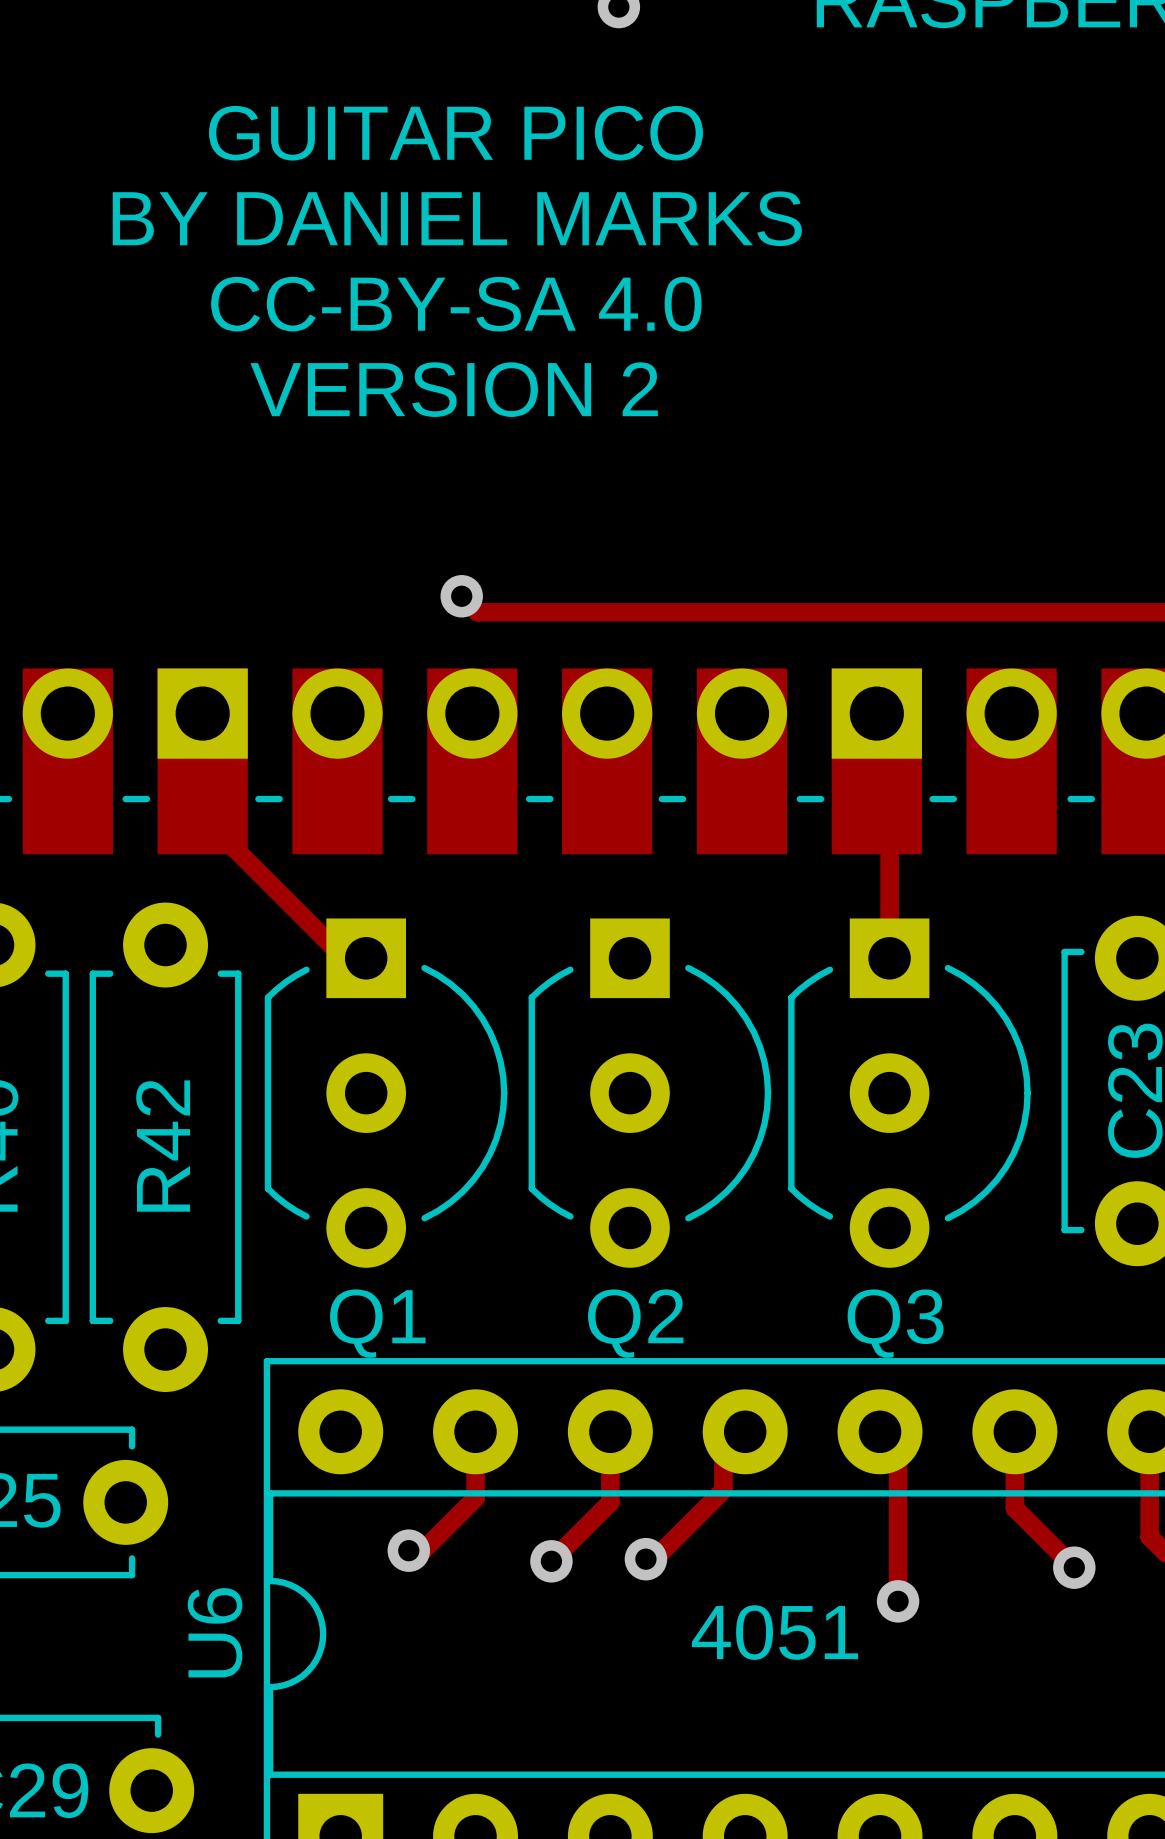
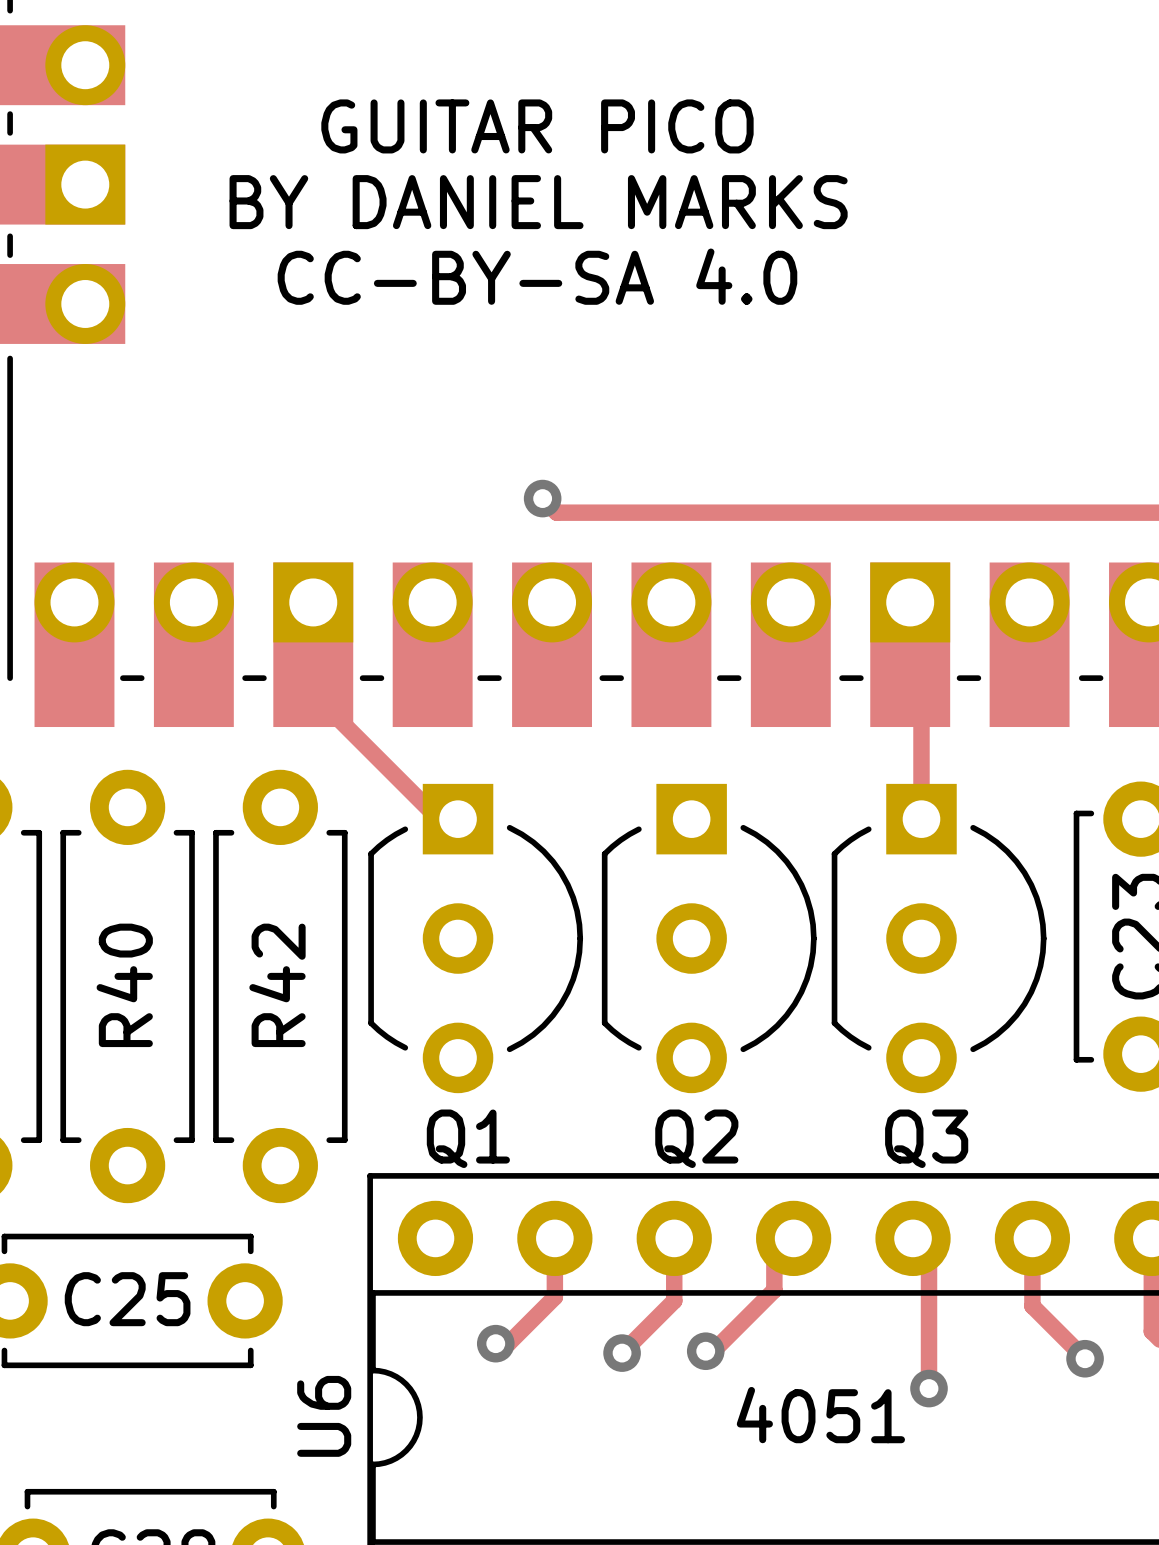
text position: GUITAR PICO (455, 133) -> GUITAR PICO (537, 126)
text position: BY DANIEL MARKS (457, 218) -> BY DANIEL MARKS (538, 202)
text position: CC-BY-SA 4.0 (456, 304) -> CC-BY-SA 4.0 (537, 276)
text: VERSION 2 (454, 389) -> none

